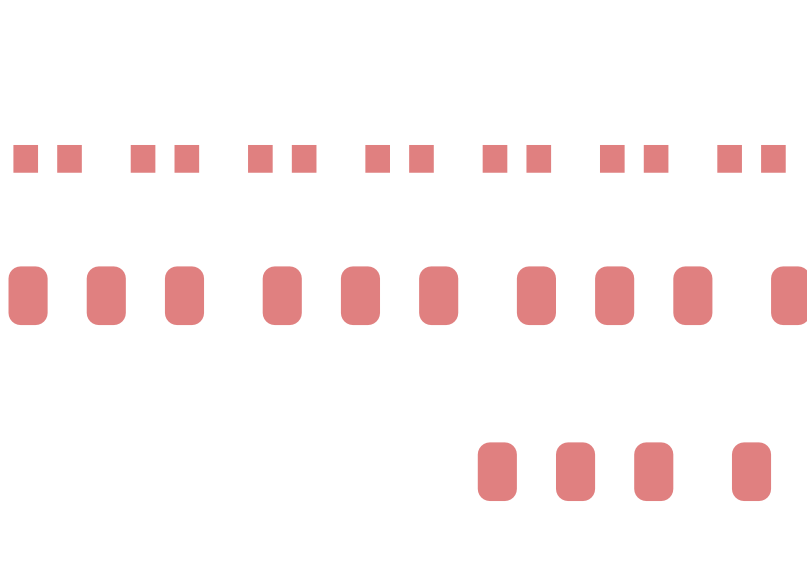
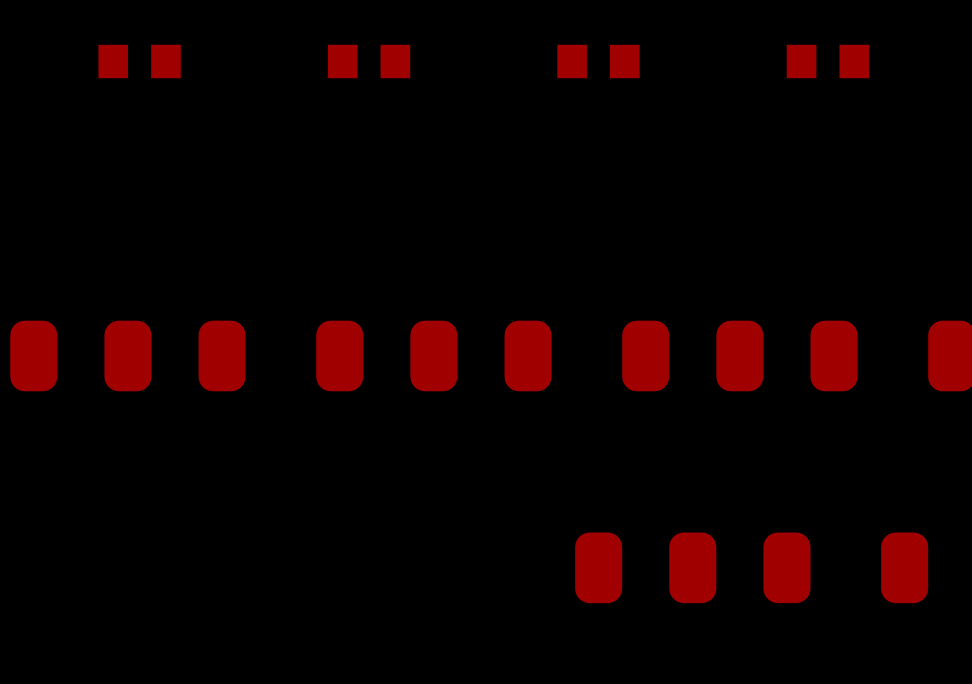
part: none -> (139, 61)
part: none -> (369, 61)
part: none -> (598, 61)
part: none -> (827, 61)
part: (47, 158) -> none
part: (164, 158) -> none
part: (282, 158) -> none
part: (399, 158) -> none
part: (516, 158) -> none
part: (634, 158) -> none
part: (751, 158) -> none

